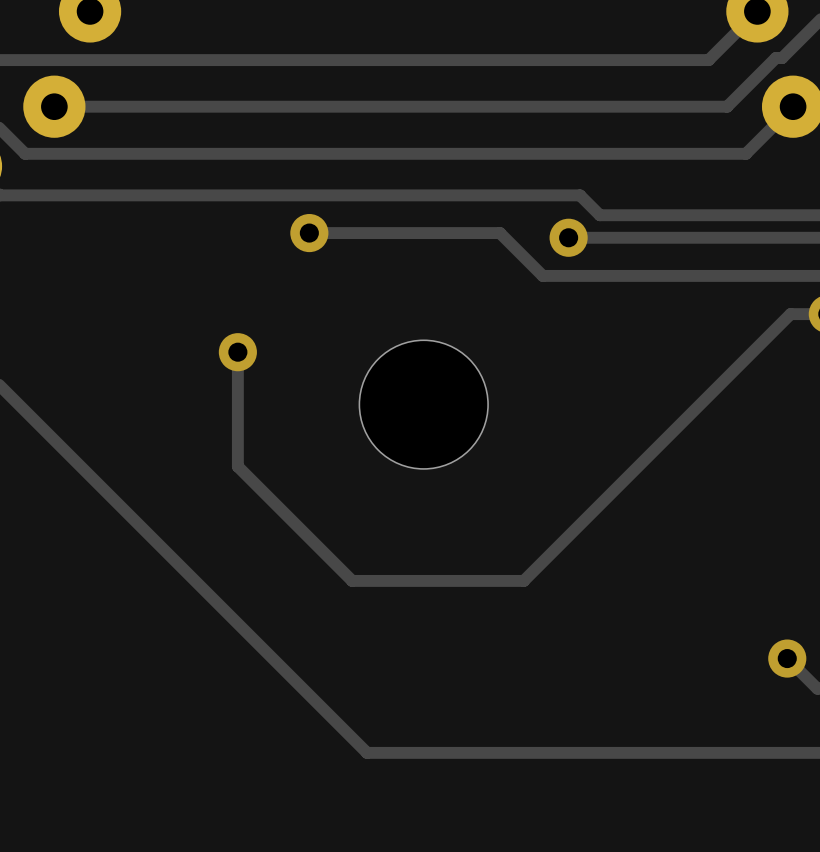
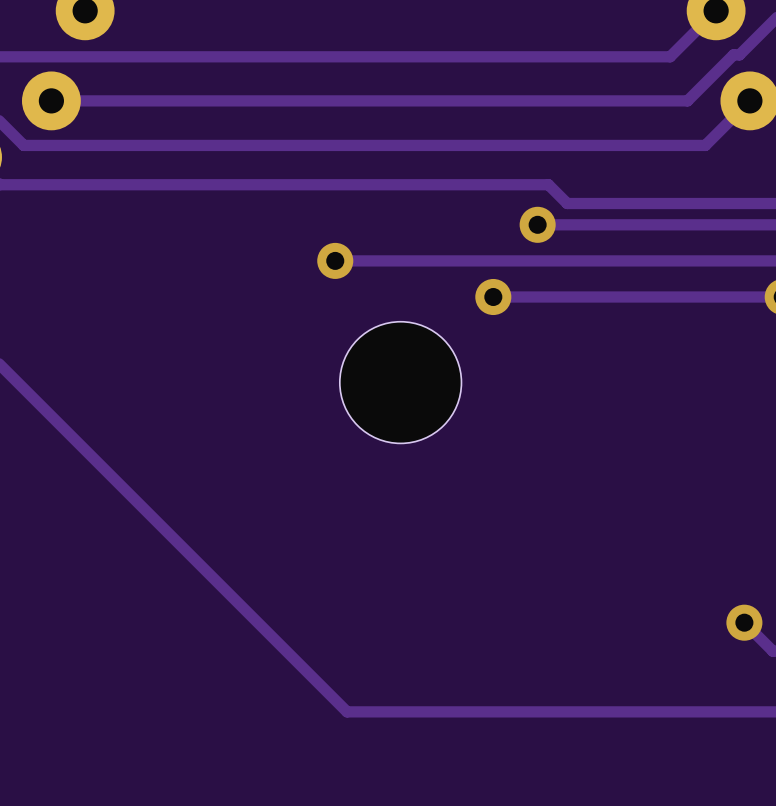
track: (309, 233) (499, 233) (542, 275) -> (335, 260) (513, 260)
via position: (309, 233) -> (335, 260)
via: none -> (493, 297)
track: (790, 314) (523, 580) (352, 580) (237, 466) (237, 352) -> (747, 297) (493, 297)
via: (237, 352) -> none

